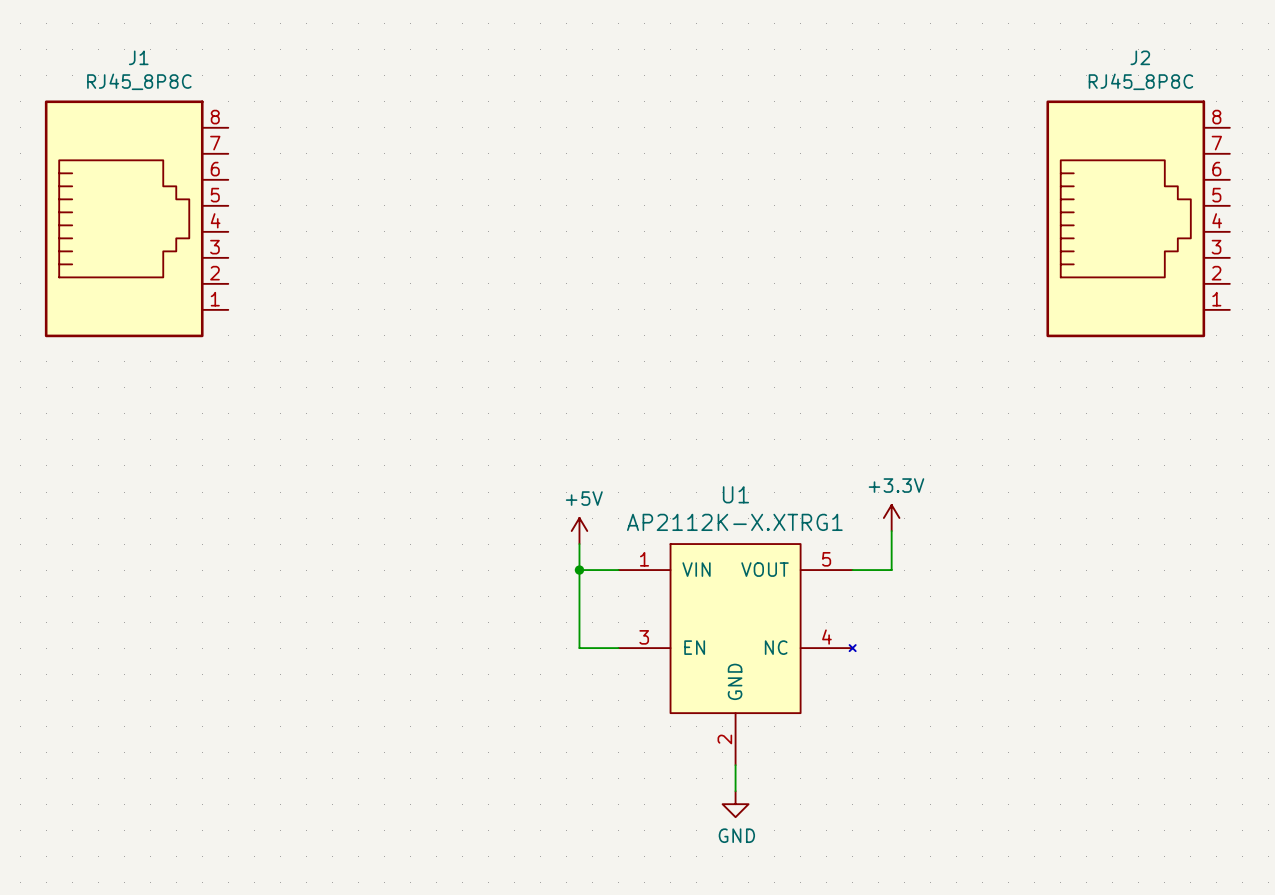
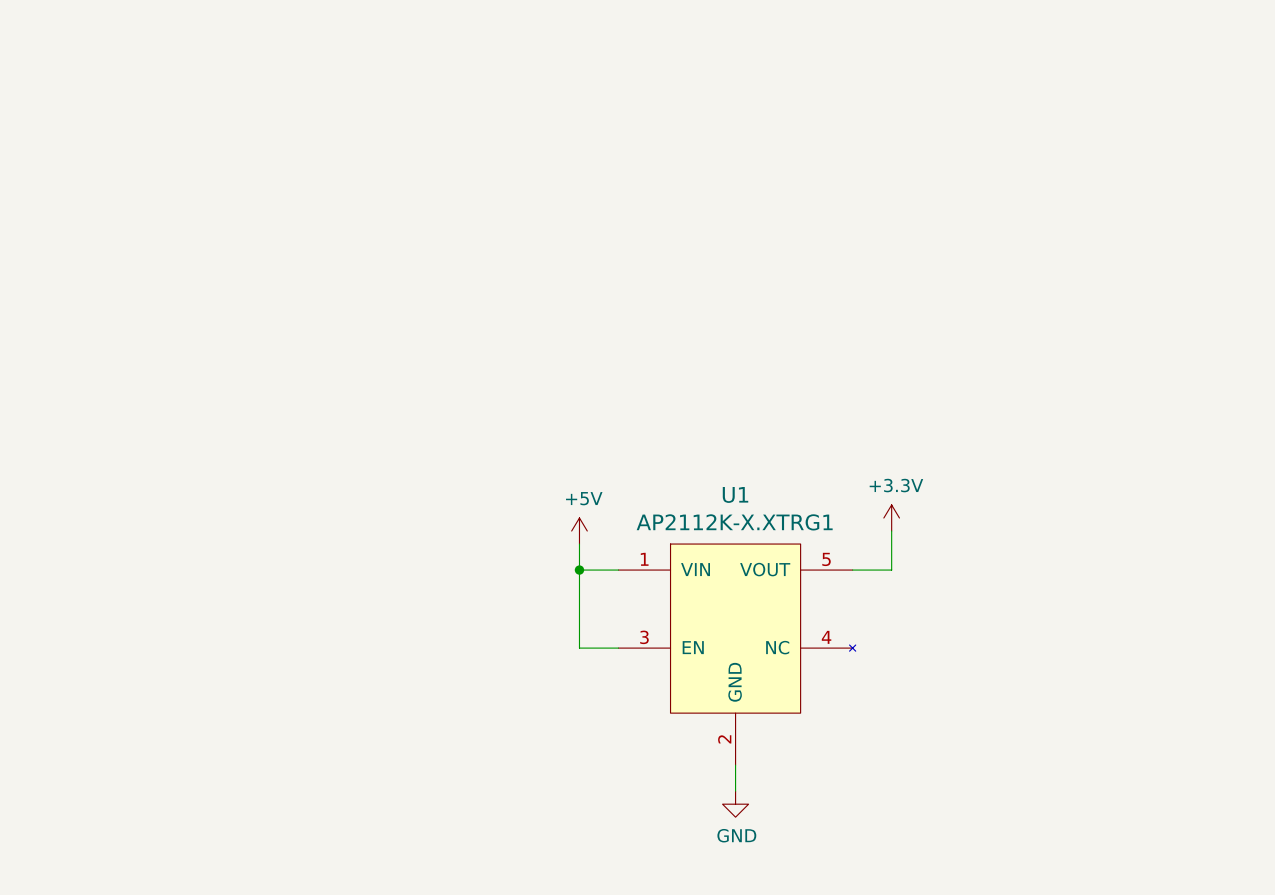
J1: RJ45_8P8C (136, 218) -> none
J2: RJ45_8P8C (1138, 218) -> none

